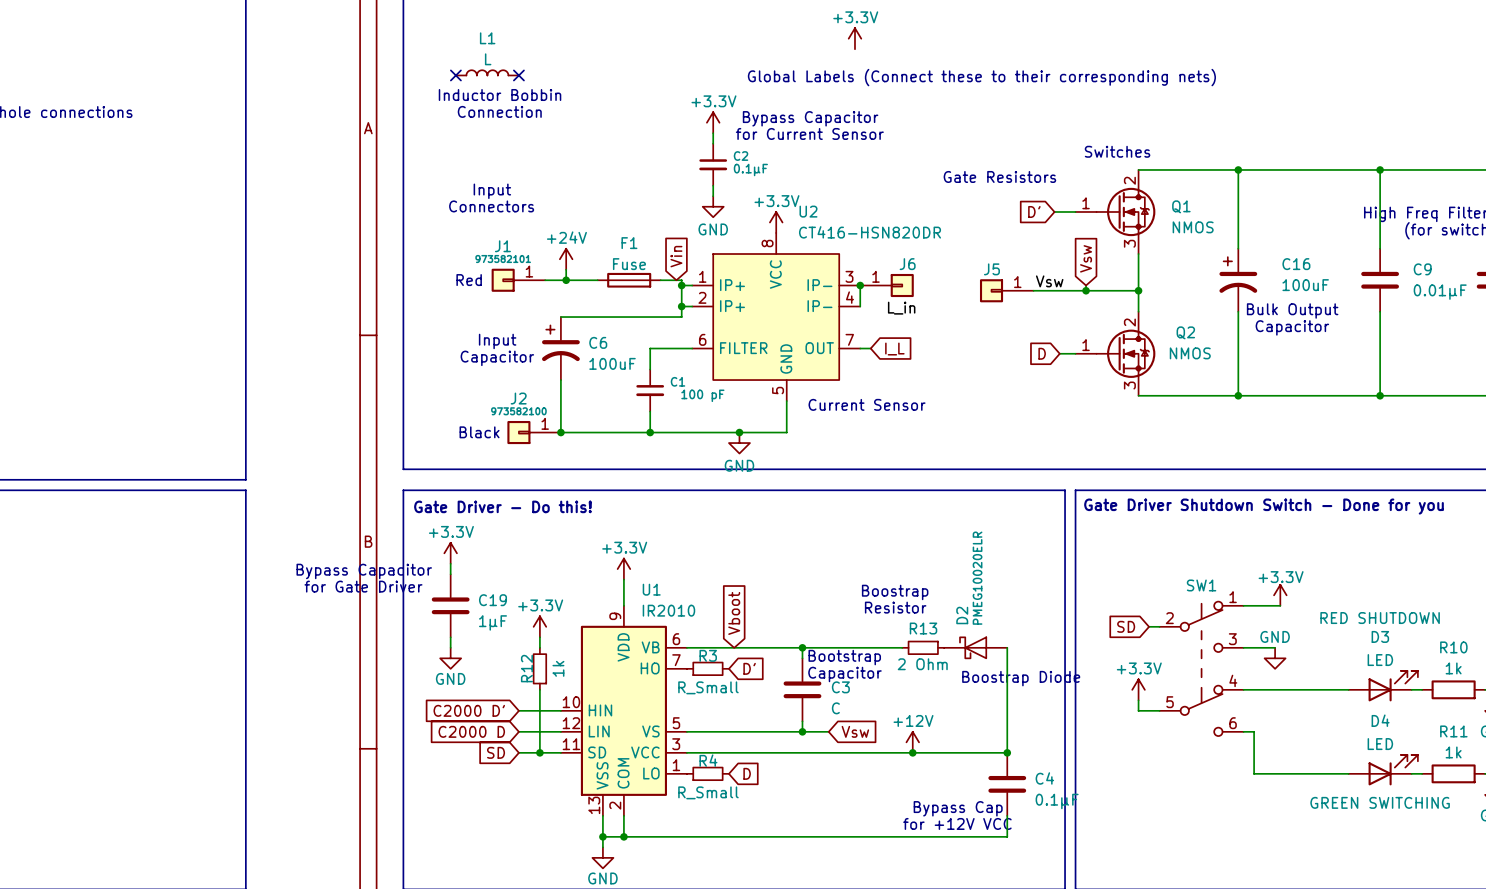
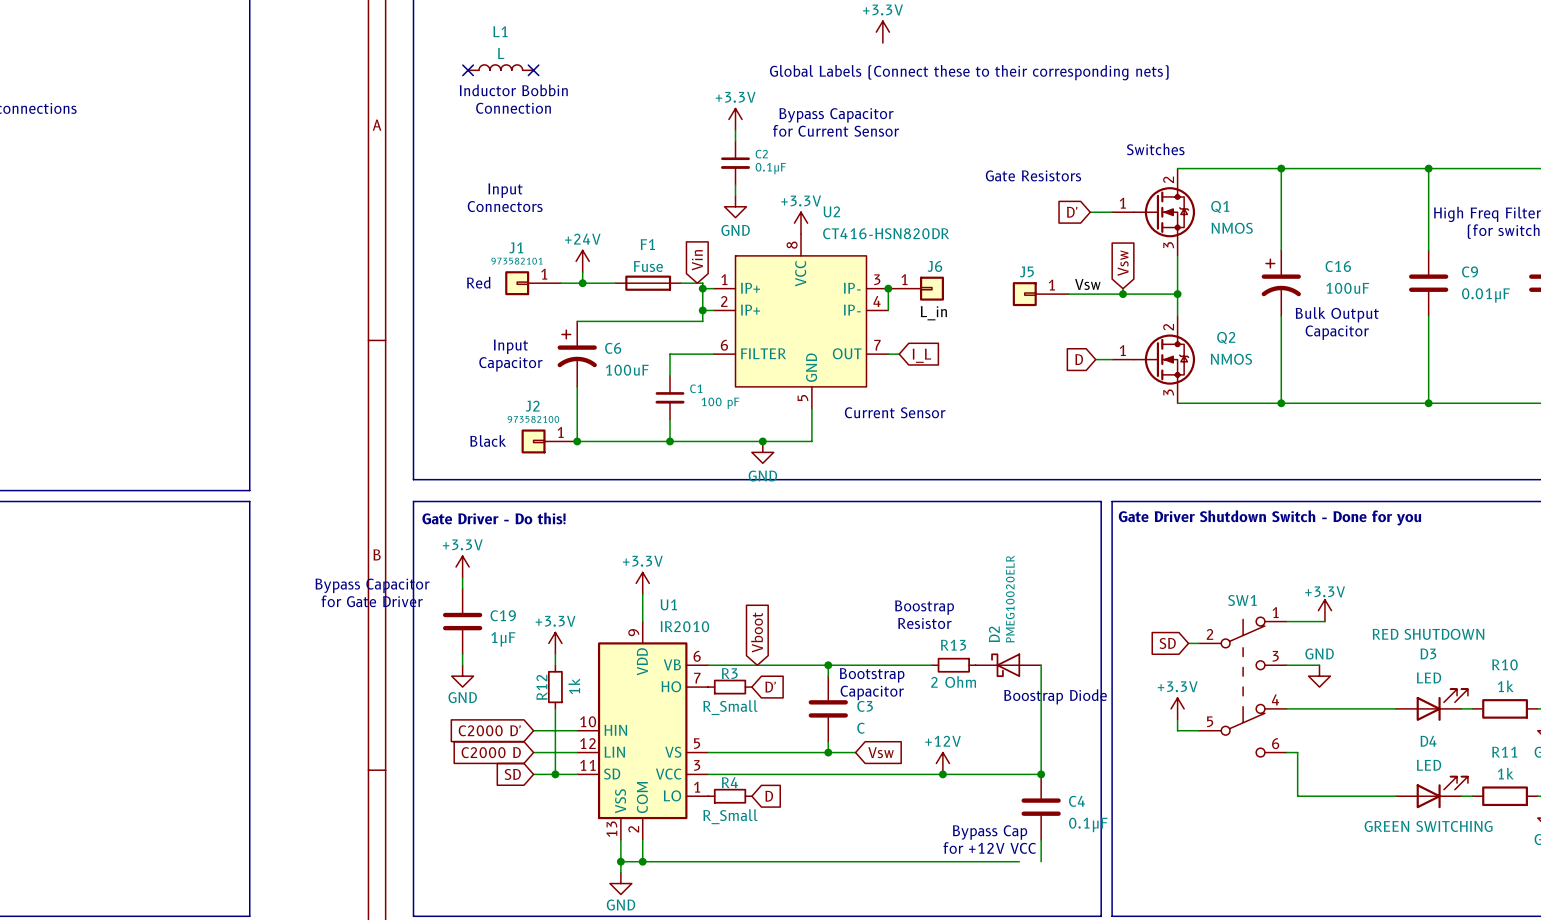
wire: (986, 836) (1007, 836) -> none

